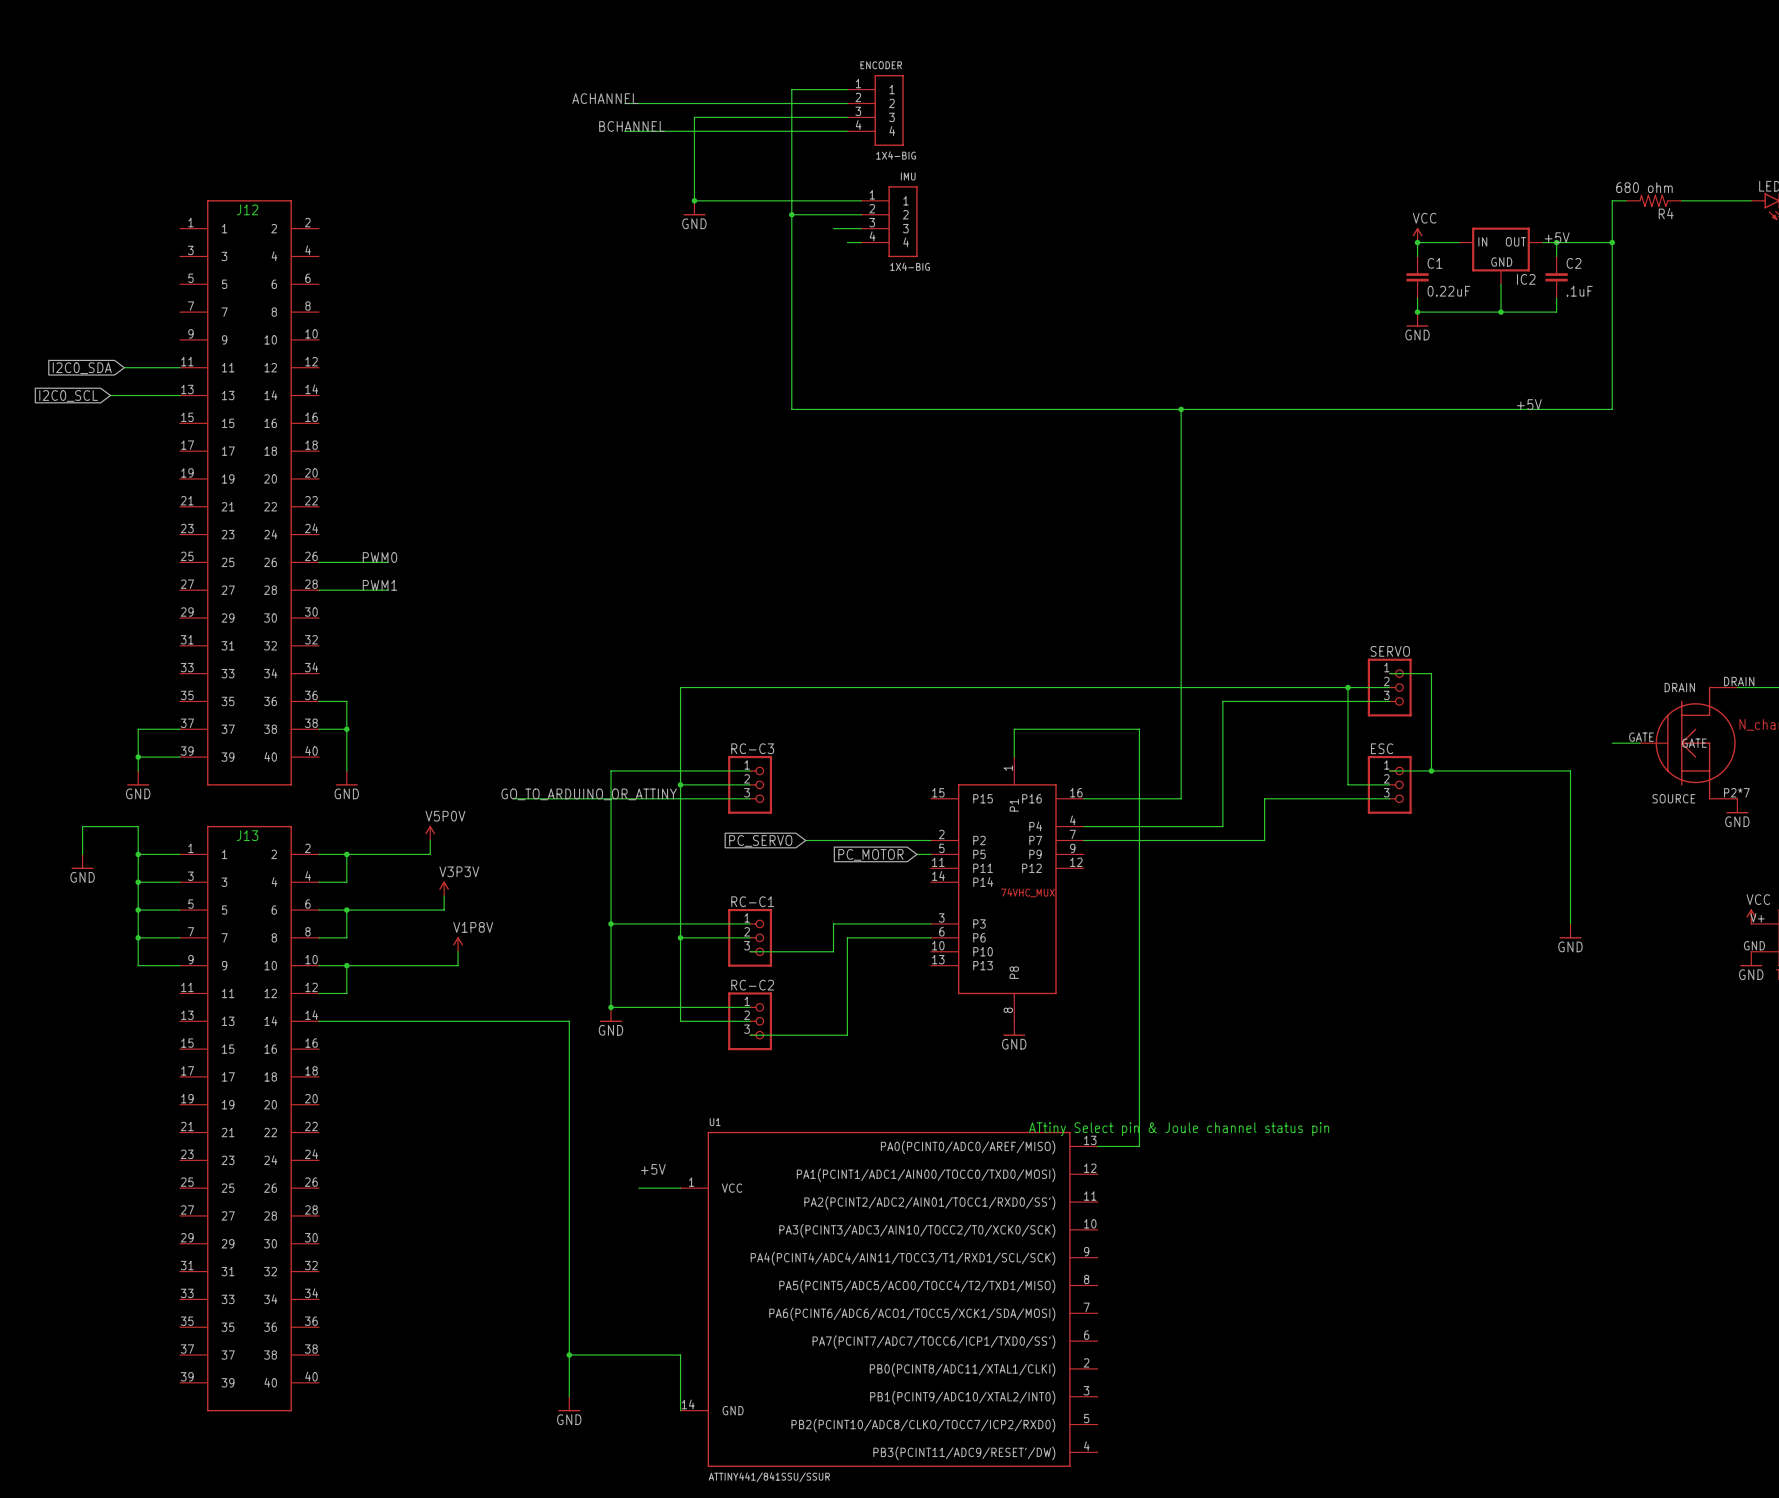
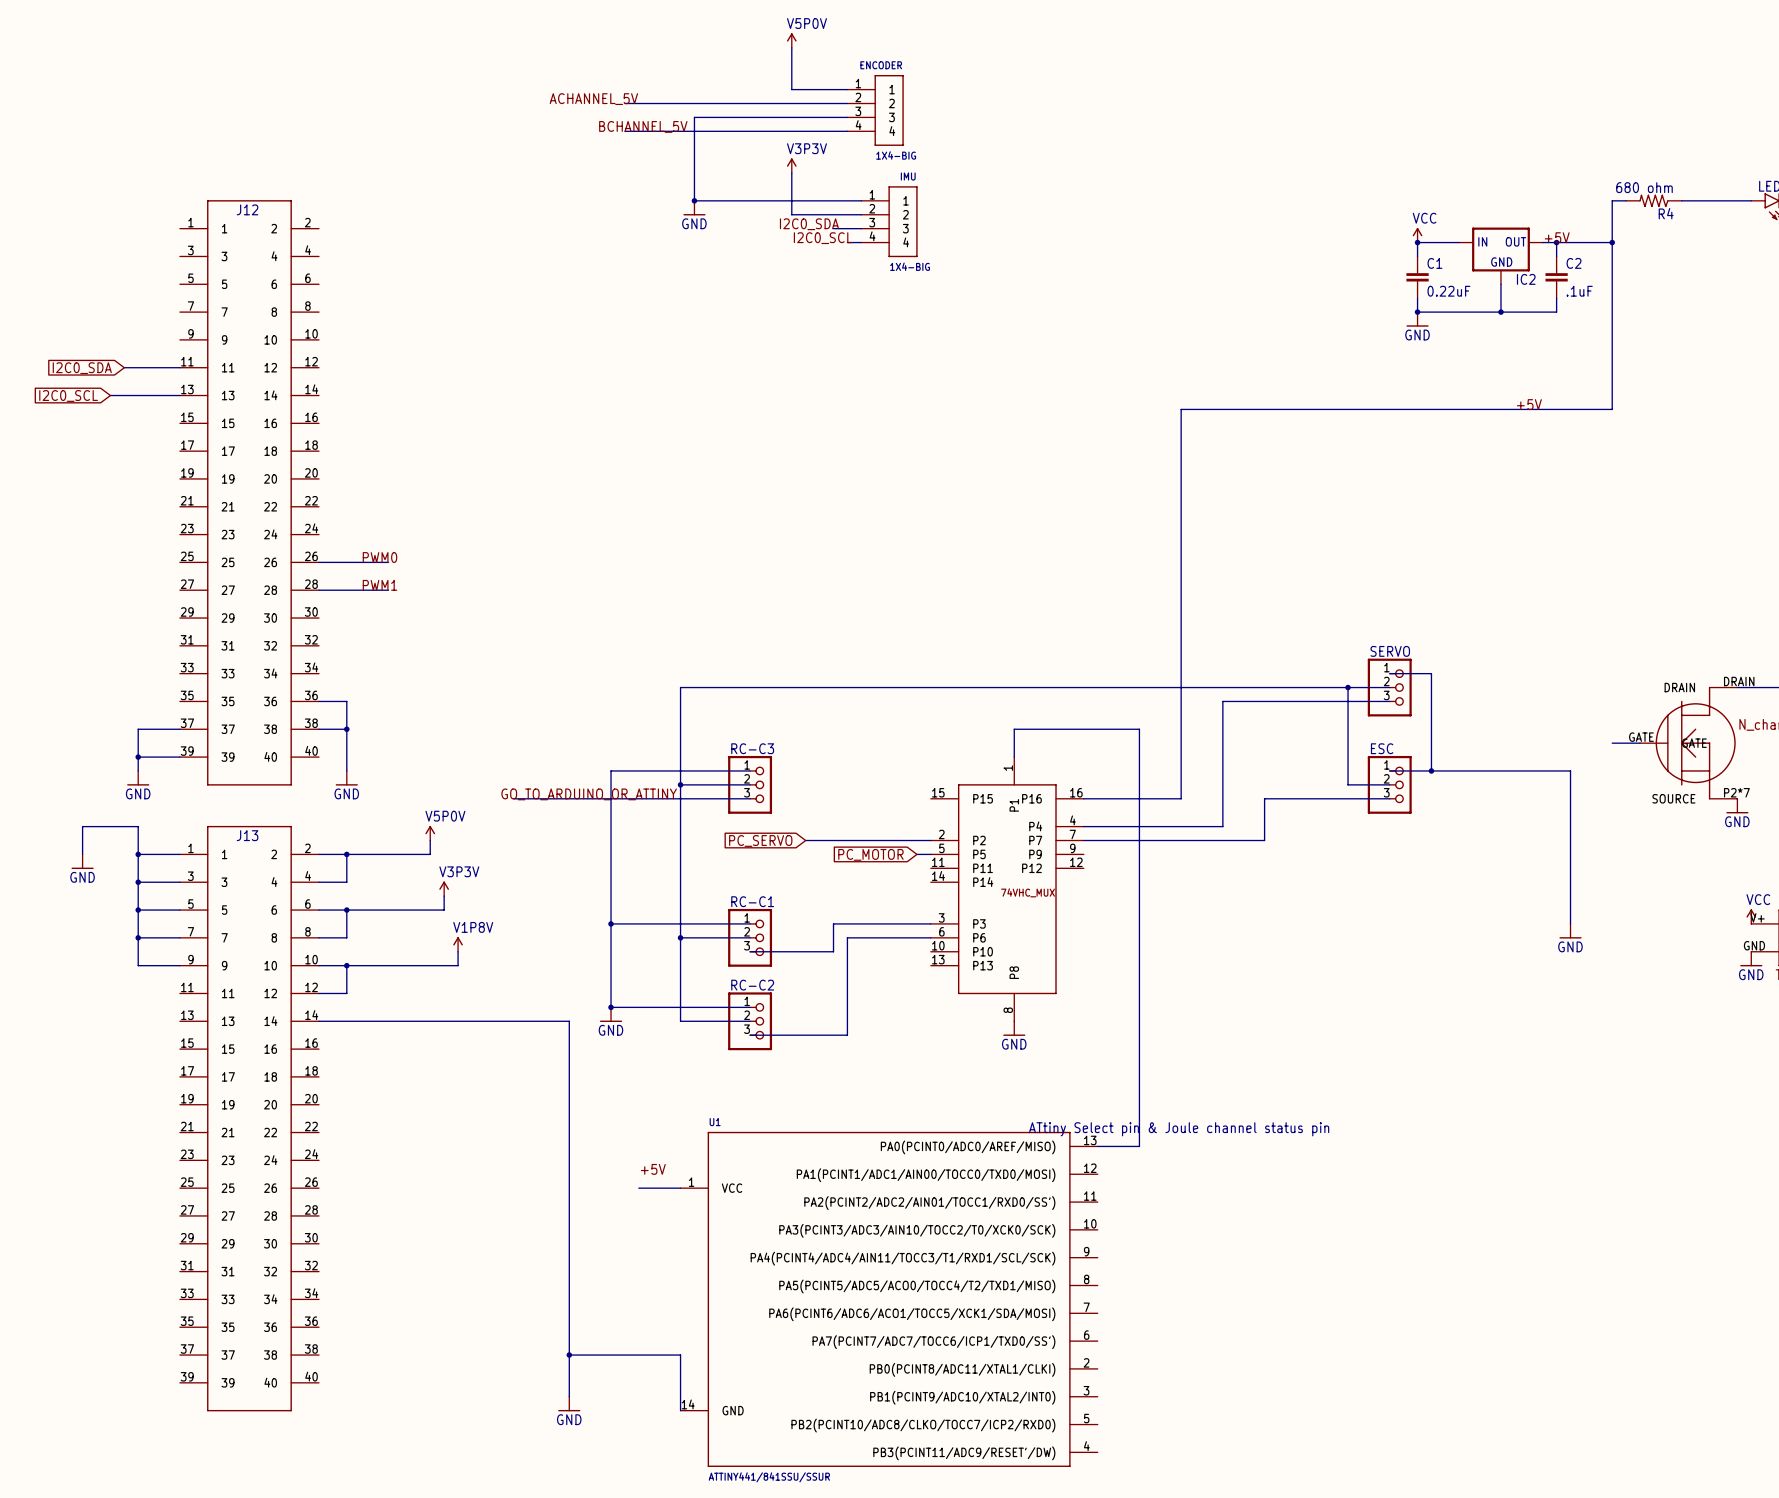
power symbol: none -> V5P0V (791, 40)
wire: (791, 89) (791, 173) -> (791, 89) (791, 47)
label: ACHANNEL (605, 98) -> ACHANNEL_5V (593, 99)
label: BCHANNEL (632, 126) -> BCHANNEL_5V (643, 126)
power symbol: none -> V3P3V (791, 165)
wire: (791, 214) (791, 409) (1181, 409) -> none
junction: (791, 214) -> none
label: none -> I2C0_SDA (809, 224)
label: none -> I2C0_SCL (823, 238)
junction: (1181, 409) -> none

